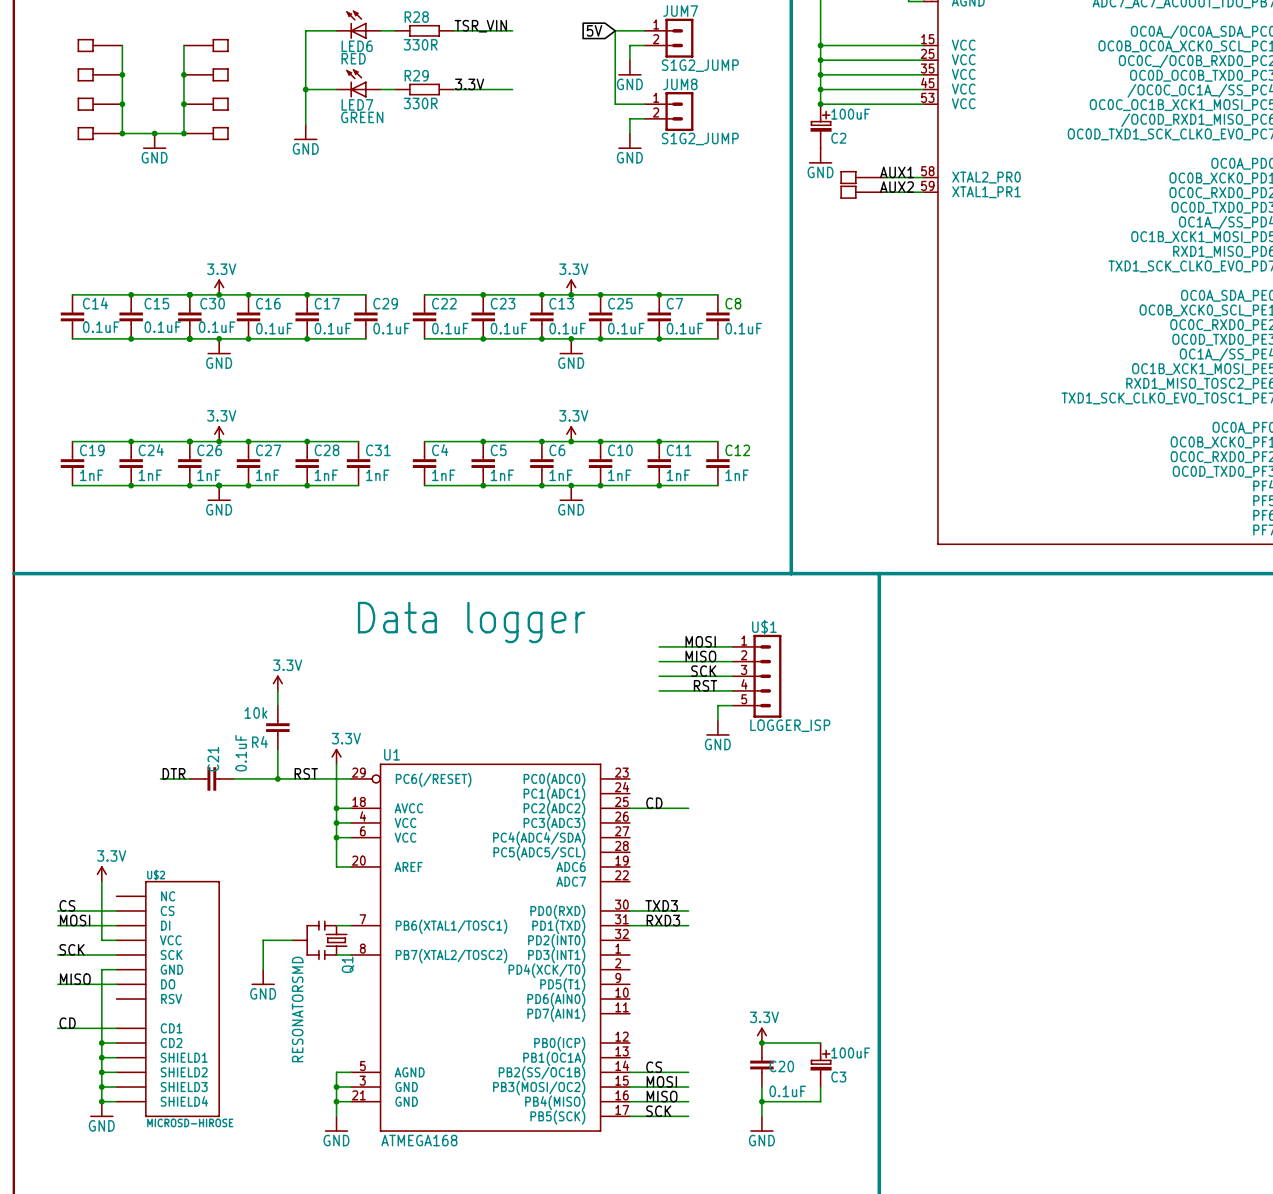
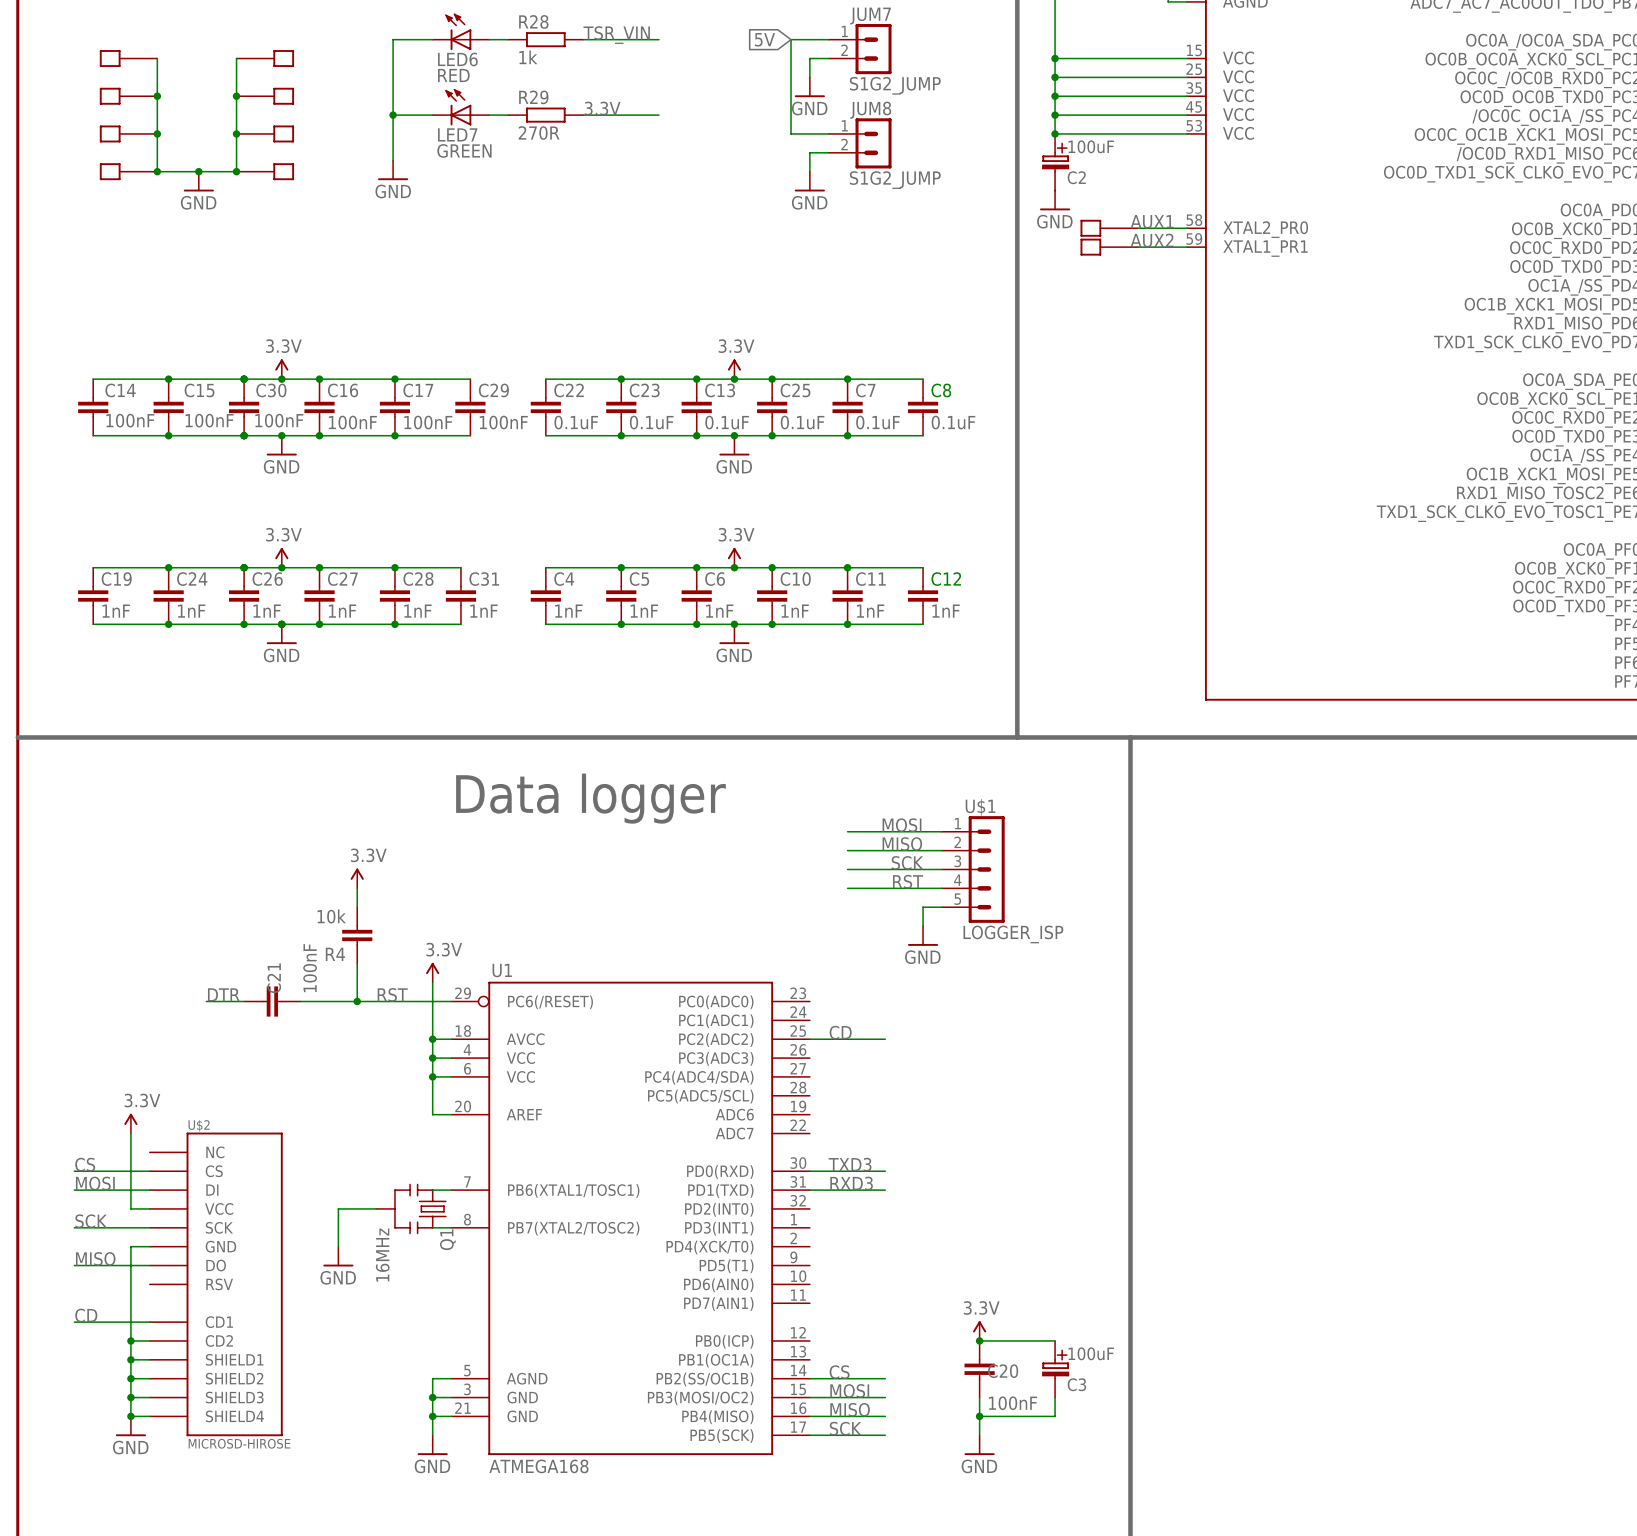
R28 value: 330R (420, 44) -> 1k (528, 57)
R29 value: 330R (420, 103) -> 270R (539, 133)
C14 value: 0.1uF (101, 327) -> 100nF (130, 420)
C15 value: 0.1uF (162, 327) -> 100nF (209, 420)
C30 value: 0.1uF (217, 327) -> 100nF (279, 420)
C16 value: 0.1uF (274, 328) -> 100nF (352, 422)
C17 value: 0.1uF (332, 328) -> 100nF (428, 422)
C29 value: 0.1uF (391, 328) -> 100nF (503, 422)
C21 value: 0.1uF (241, 753) -> 100nF (310, 968)
Q1 value: RESONATORSMD (297, 1009) -> 16MHz (382, 1255)
C20 value: 0.1uF (787, 1091) -> 100nF (1012, 1403)

